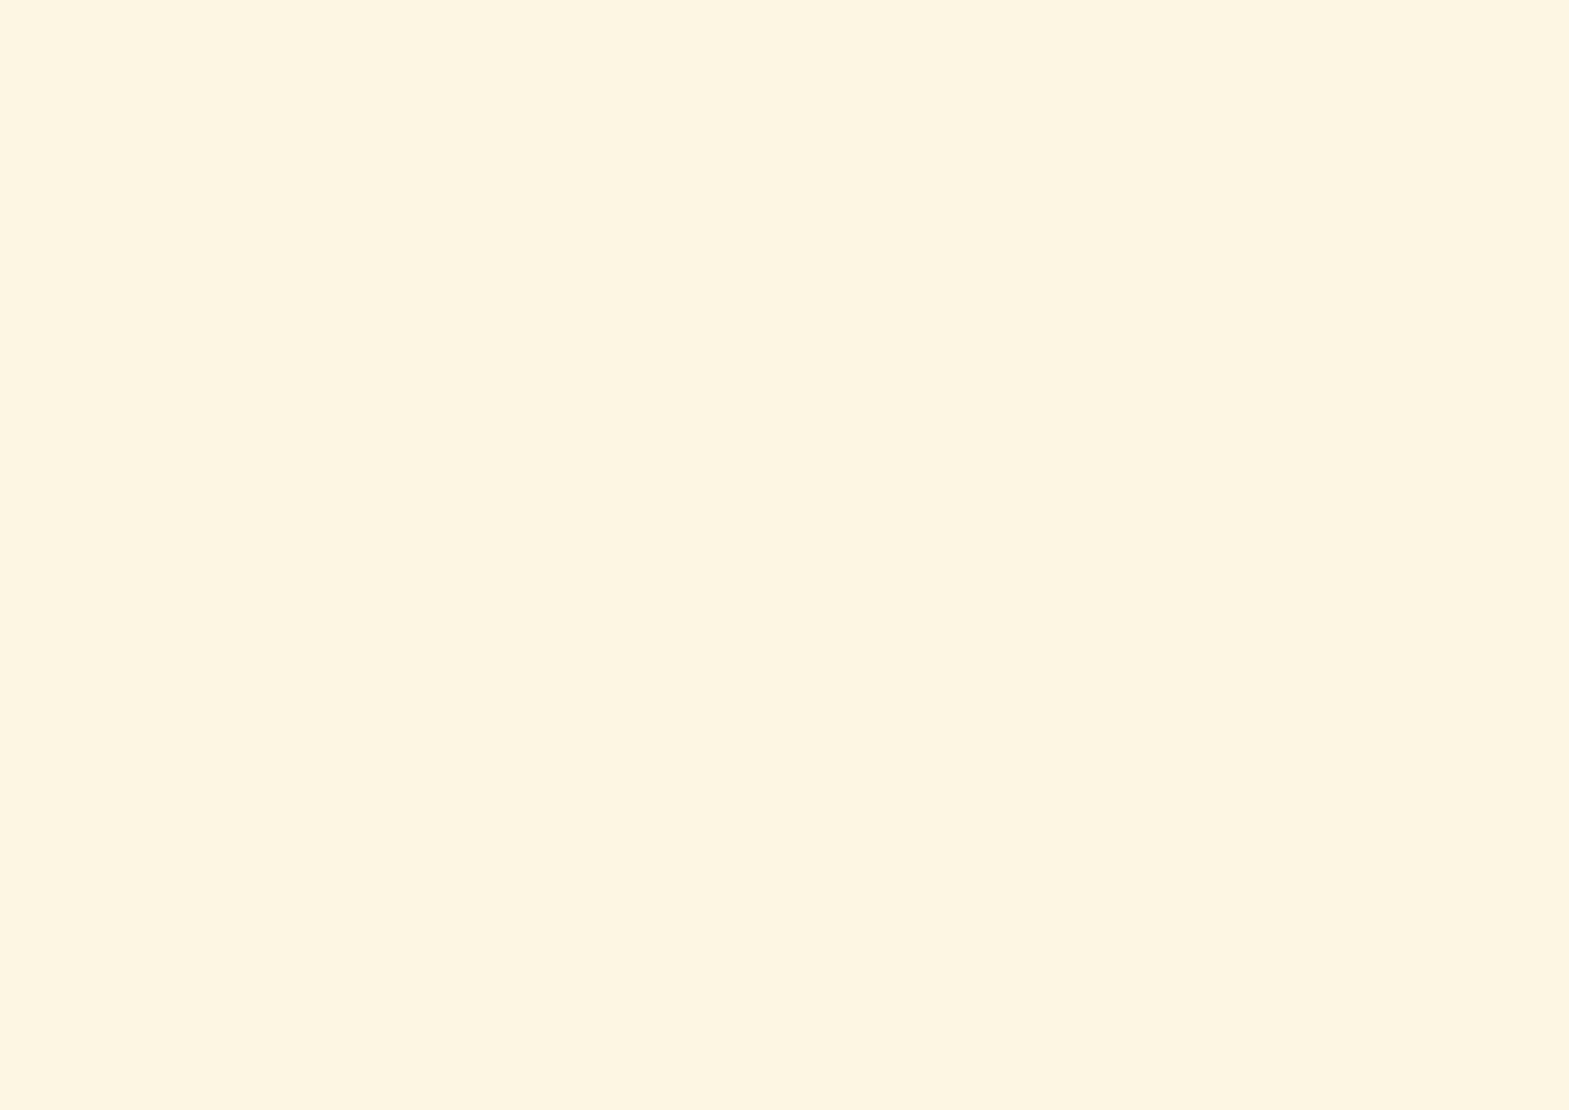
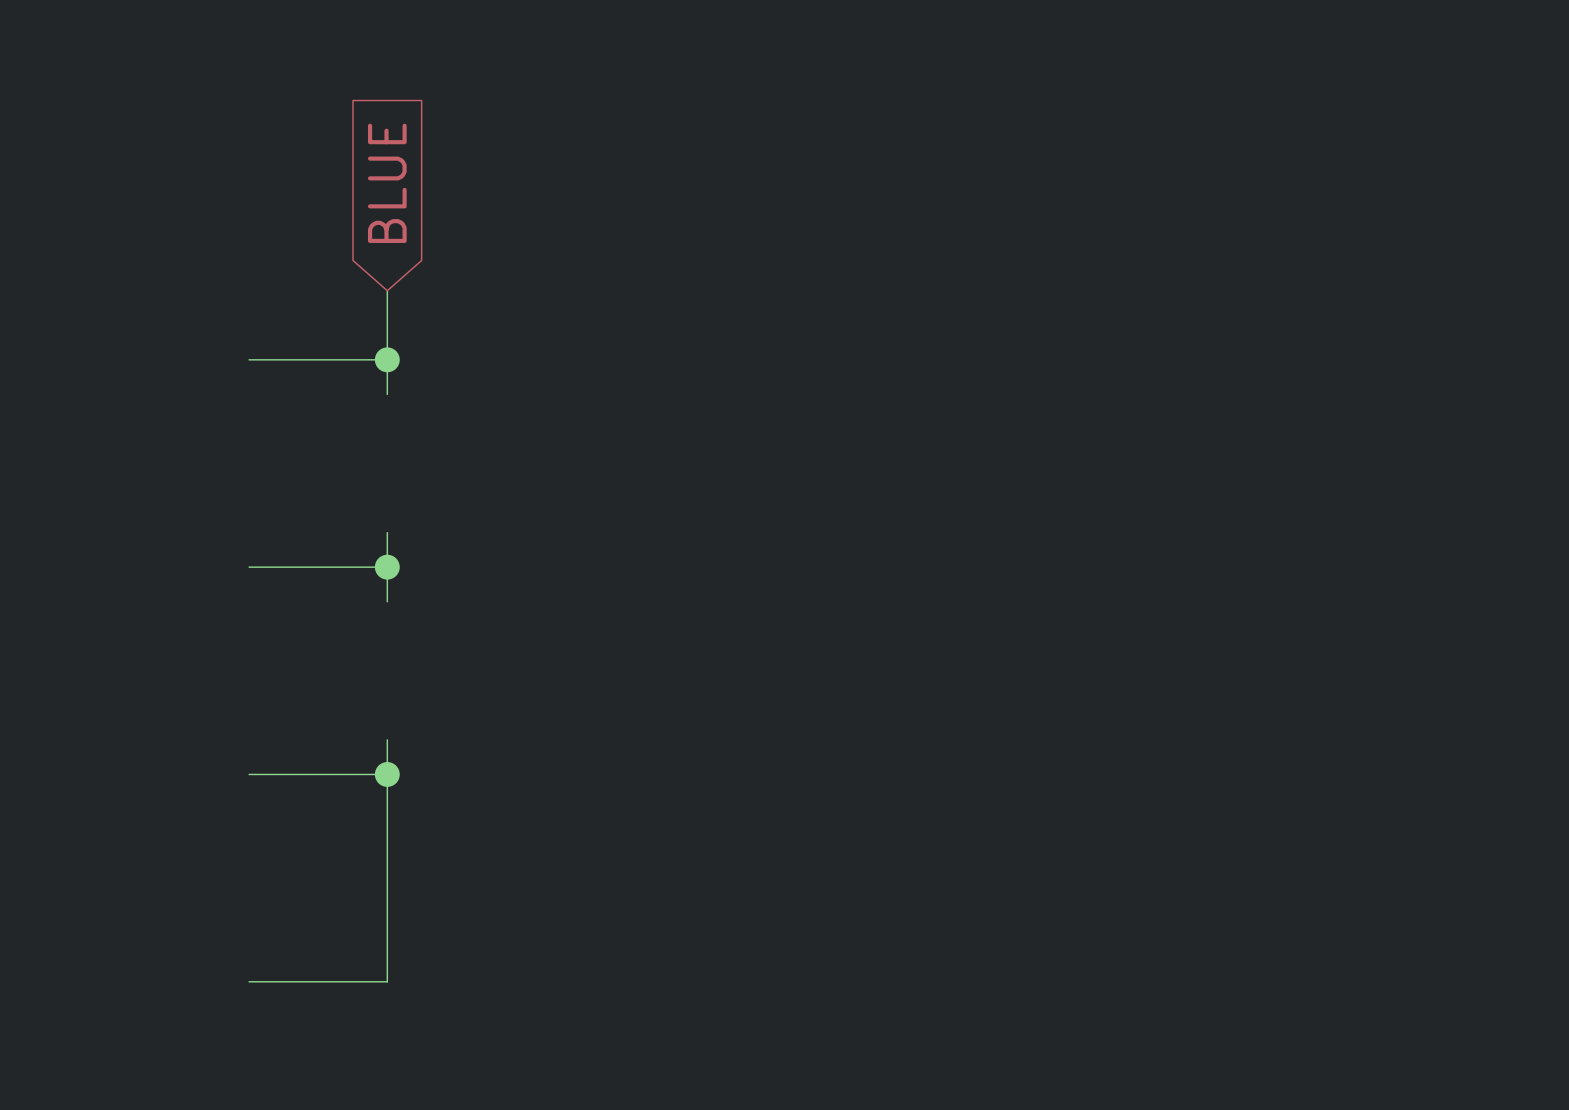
global label: none -> BLUE (387, 183)
wire: none -> (387, 290) (387, 394)
wire: none -> (249, 359) (387, 359)
junction: none -> (387, 359)
wire: none -> (387, 532) (387, 601)
wire: none -> (249, 567) (387, 567)
junction: none -> (387, 567)
wire: none -> (387, 739) (387, 981) (249, 981)
wire: none -> (249, 774) (387, 774)
junction: none -> (387, 774)

